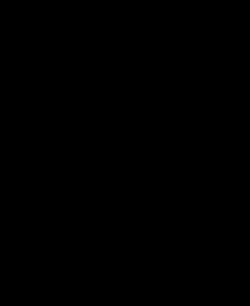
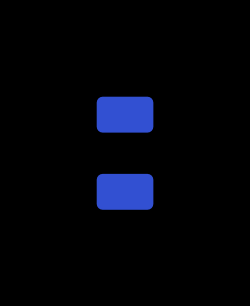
part: none -> (125, 153)

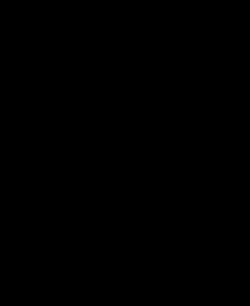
part: (125, 153) -> none

